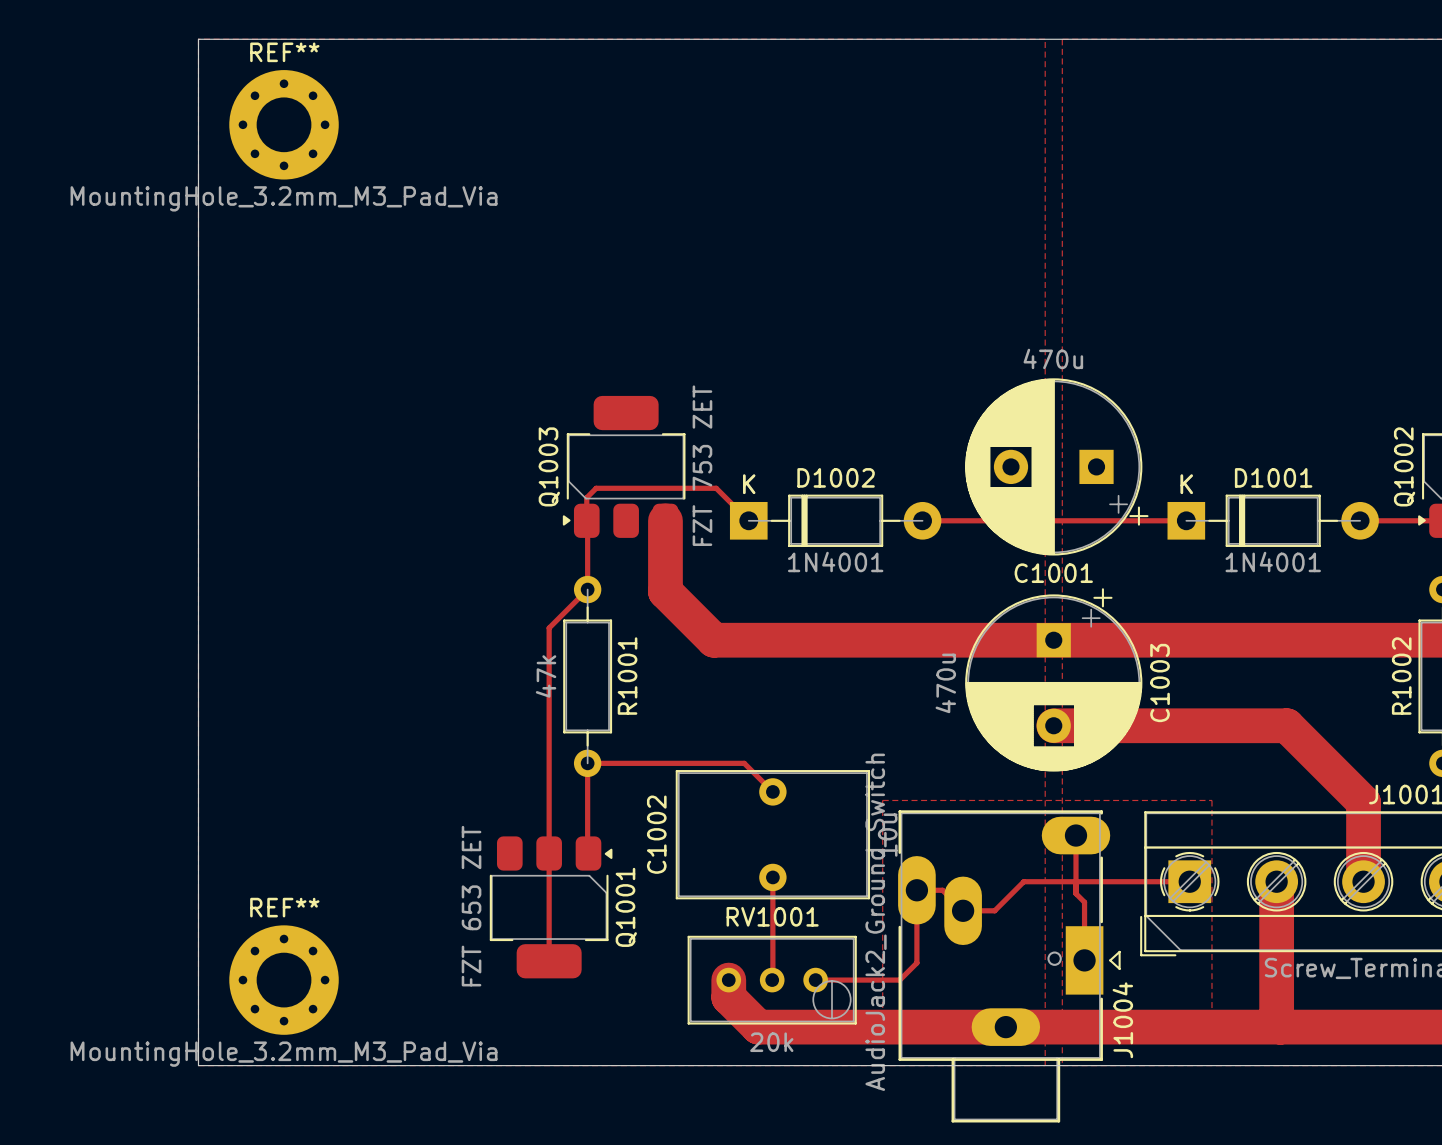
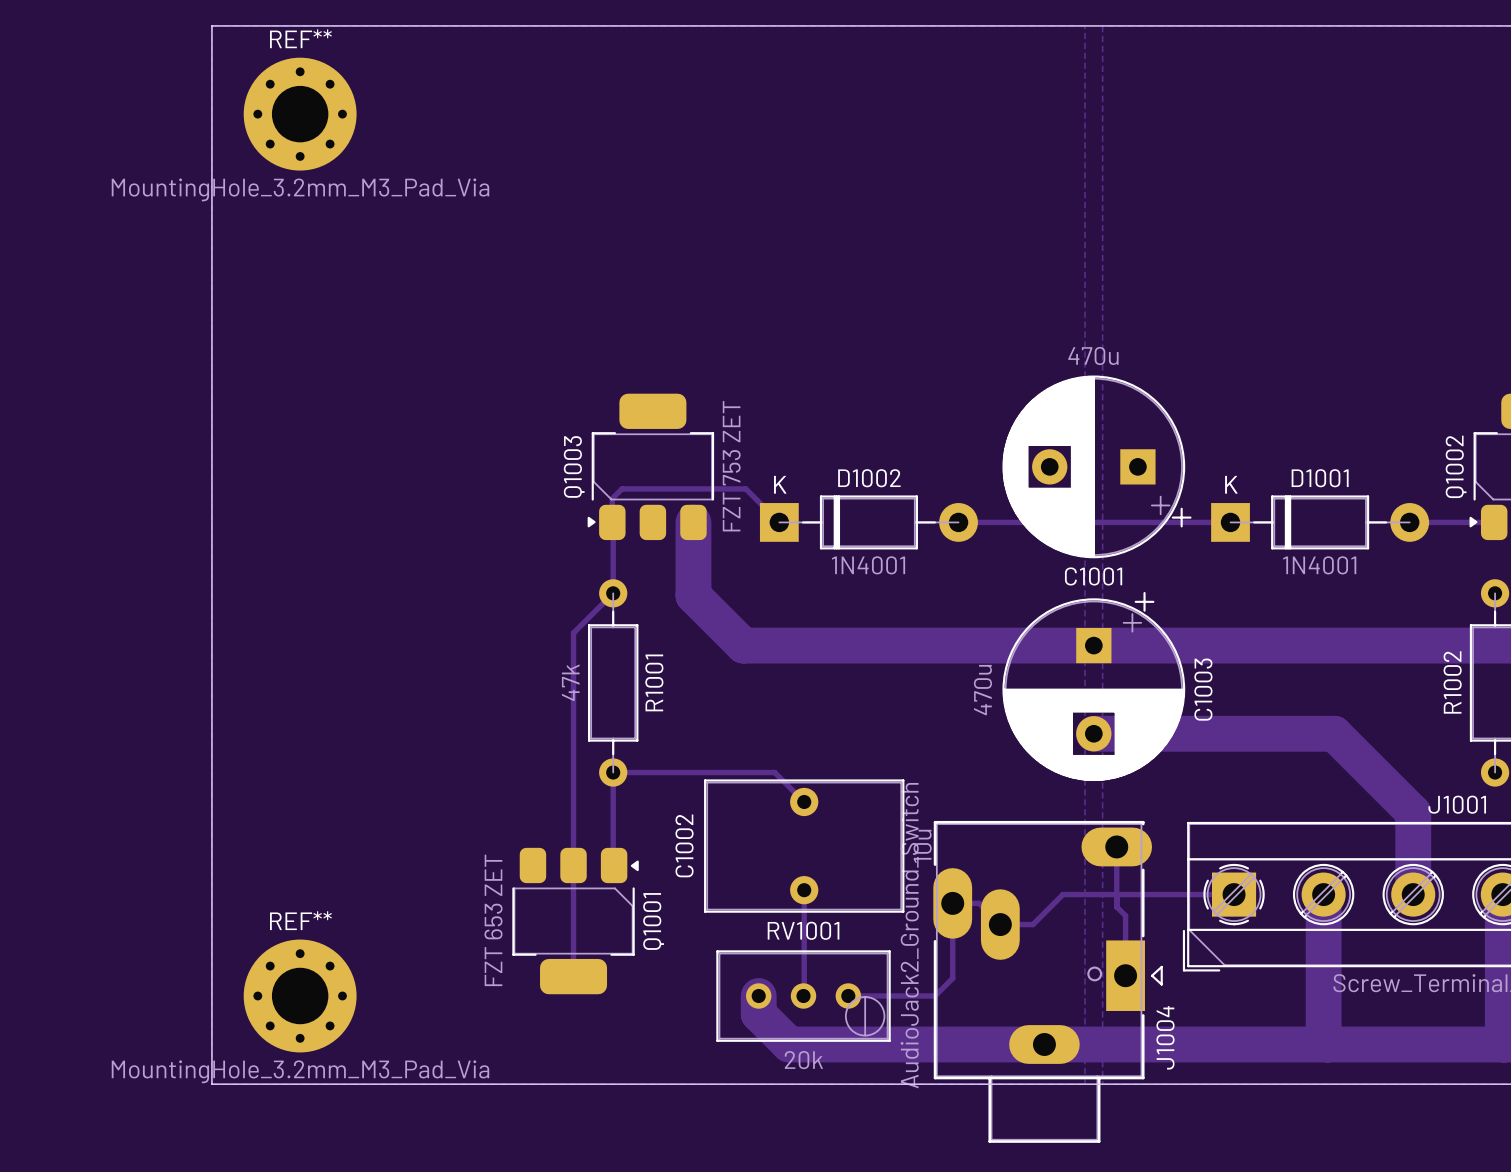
zone outline: (882, 800) (882, 1027) (1211, 1027) (1211, 800) (882, 800) -> none

